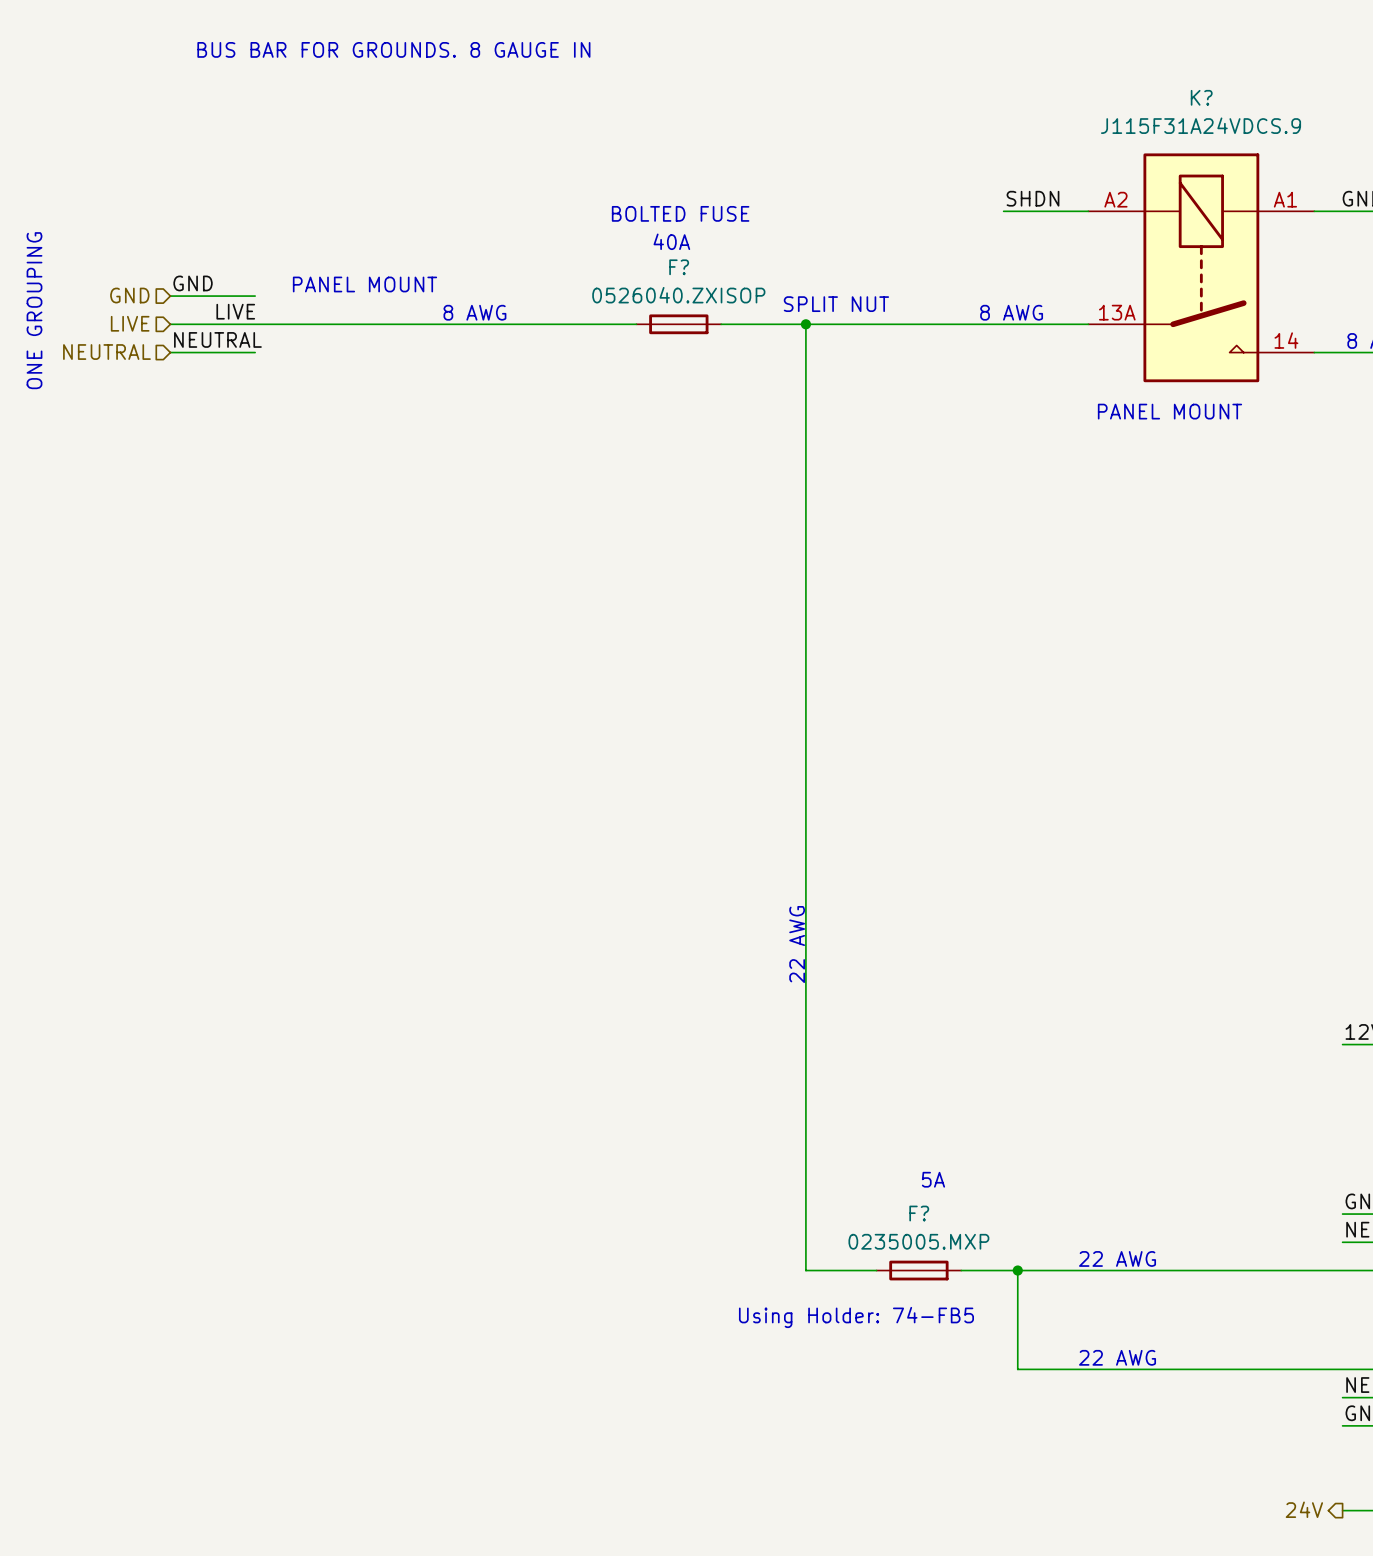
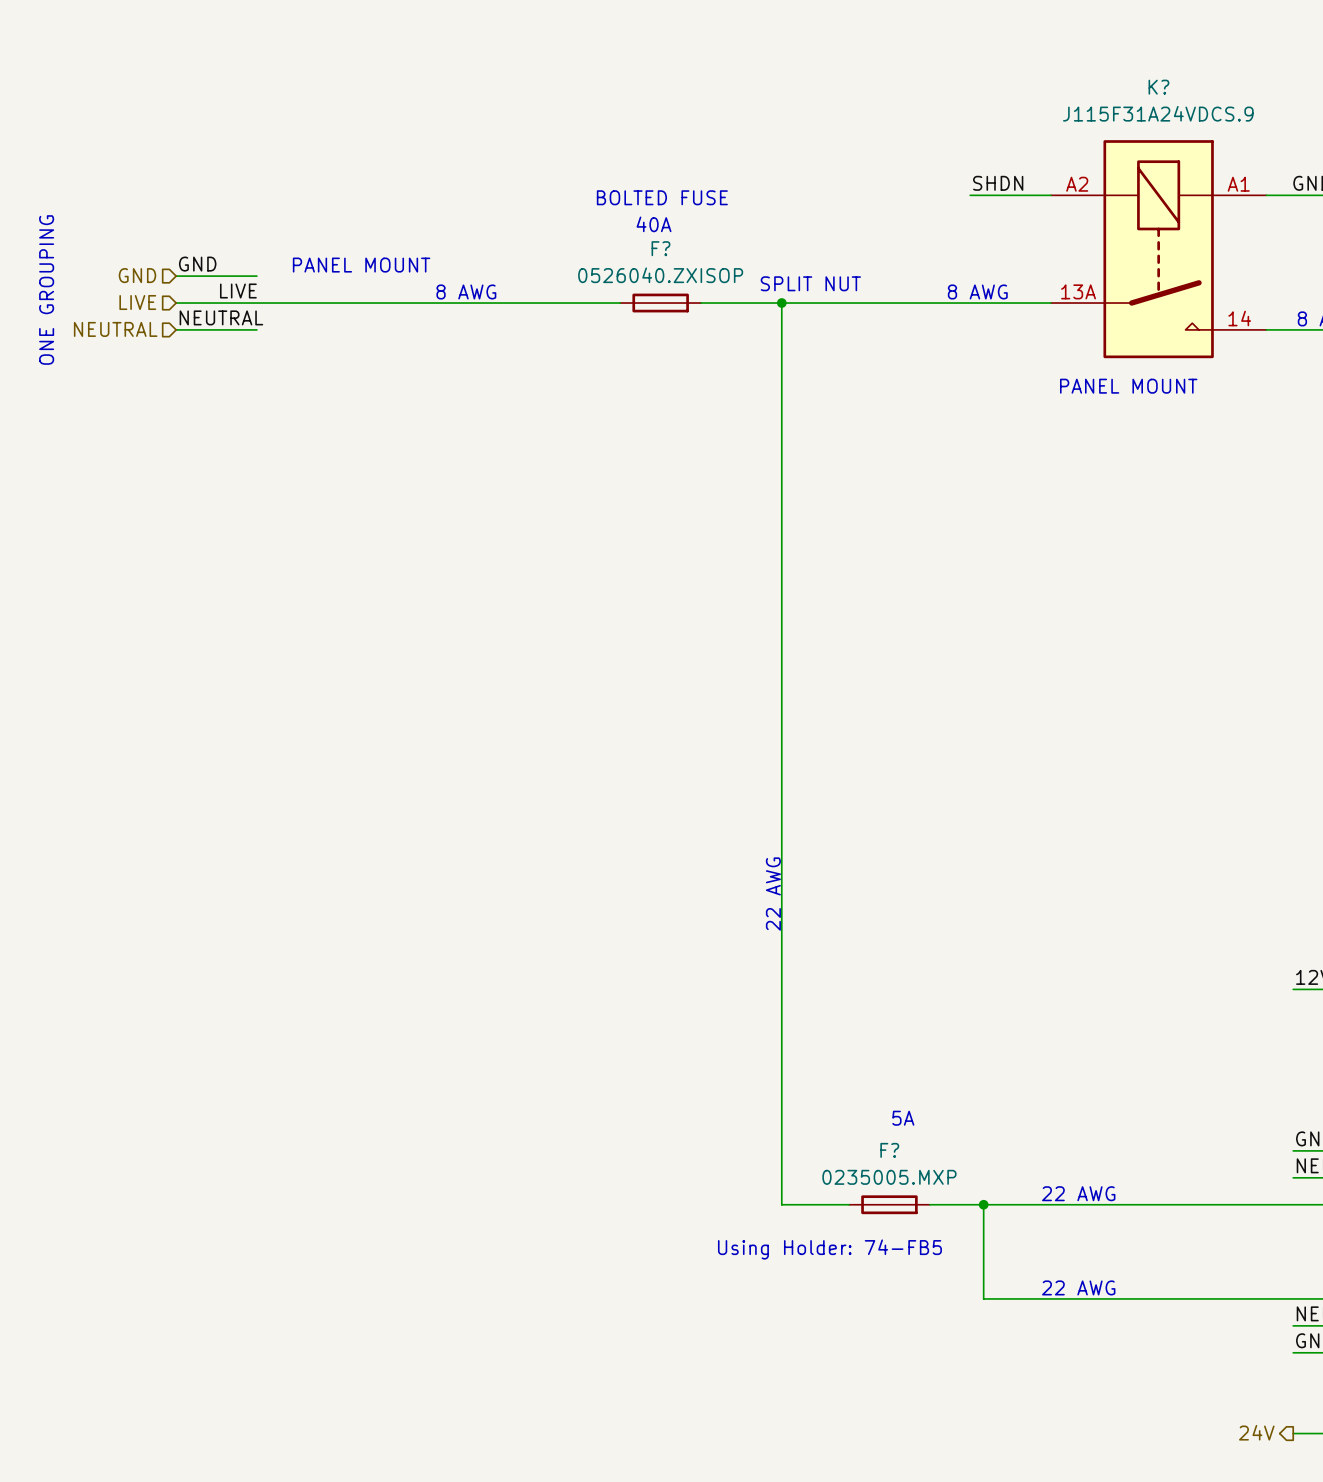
text: BUS BAR FOR GROUNDS. 8 GAUGE IN (393, 49) -> none

